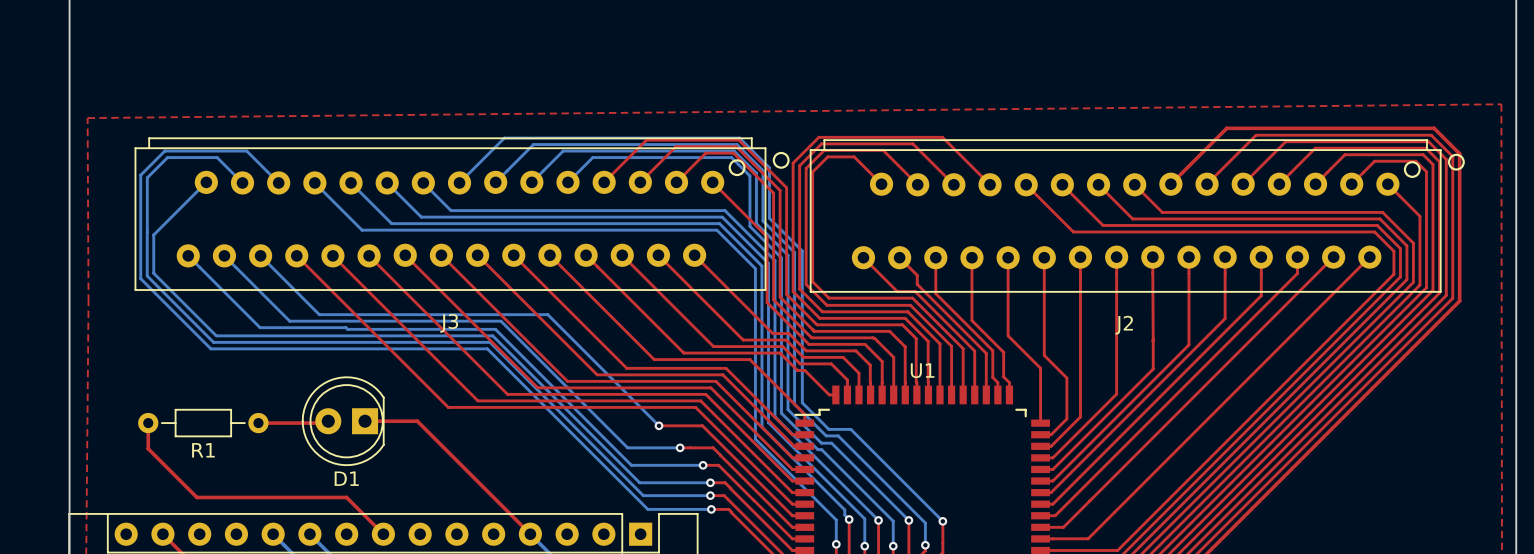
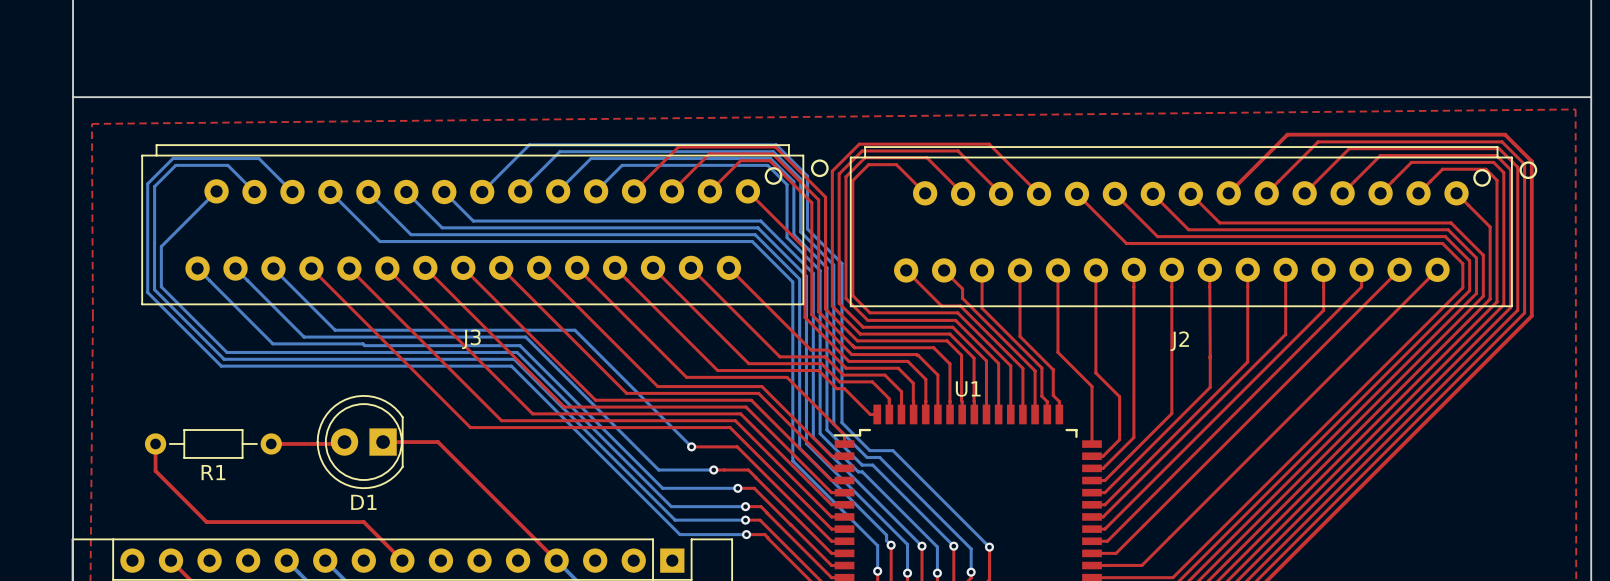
board edge: none -> (73, 97) (1591, 97)

